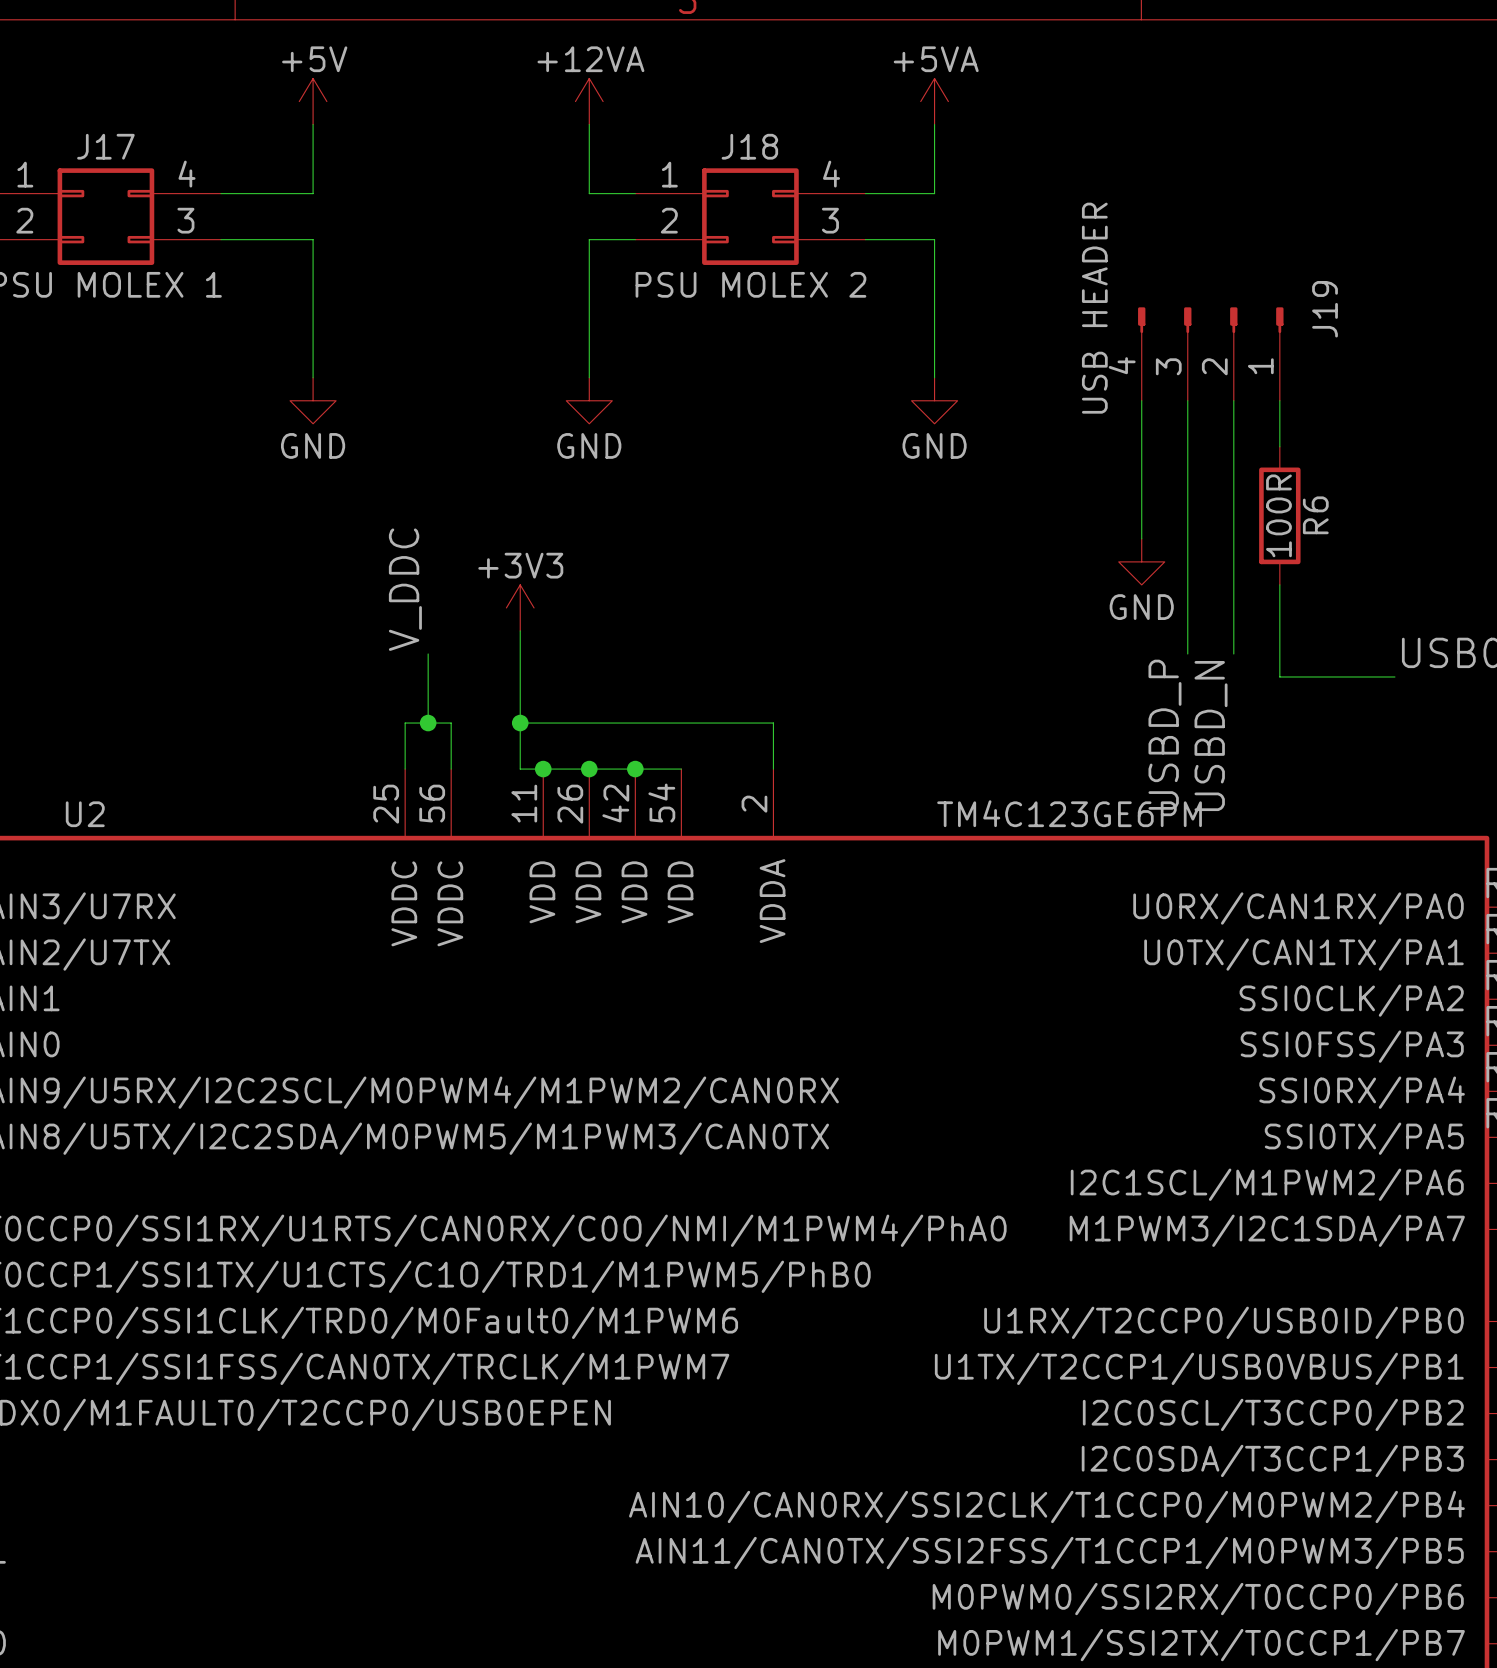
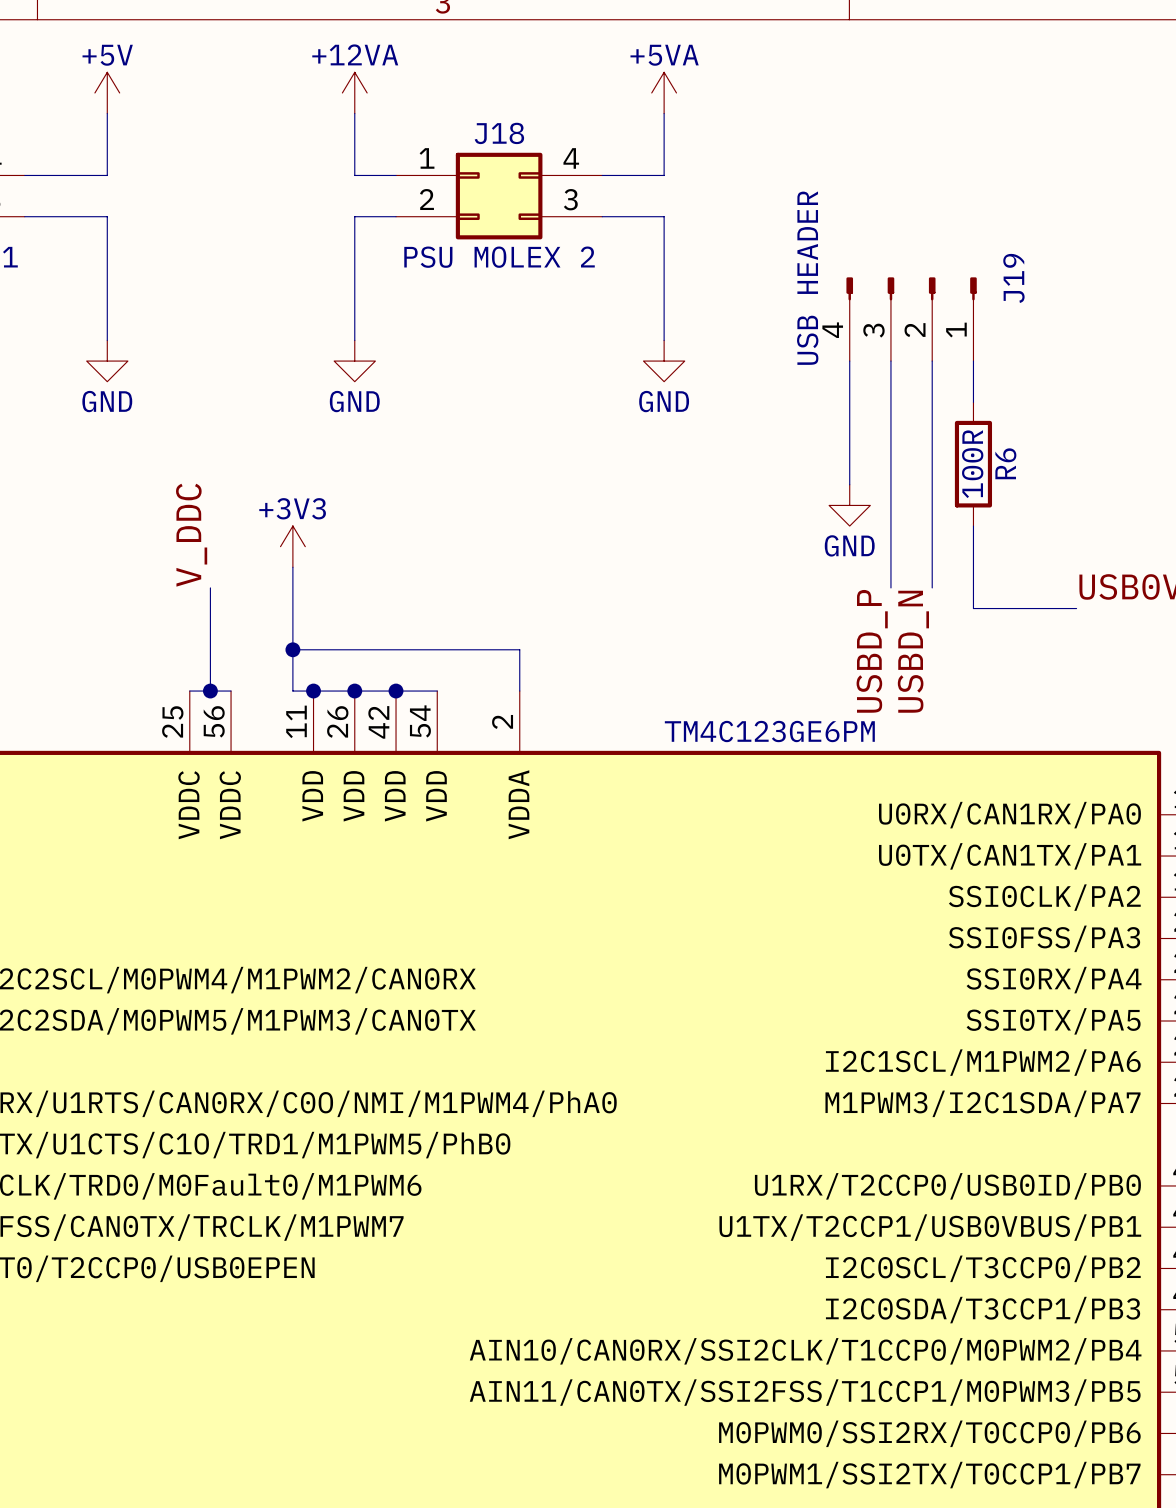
wire: none -> (210, 649) (210, 691)
junction position: (428, 723) -> (210, 691)
wire: (405, 769) (405, 723) (451, 723) (451, 769) -> (189, 691) (231, 691)

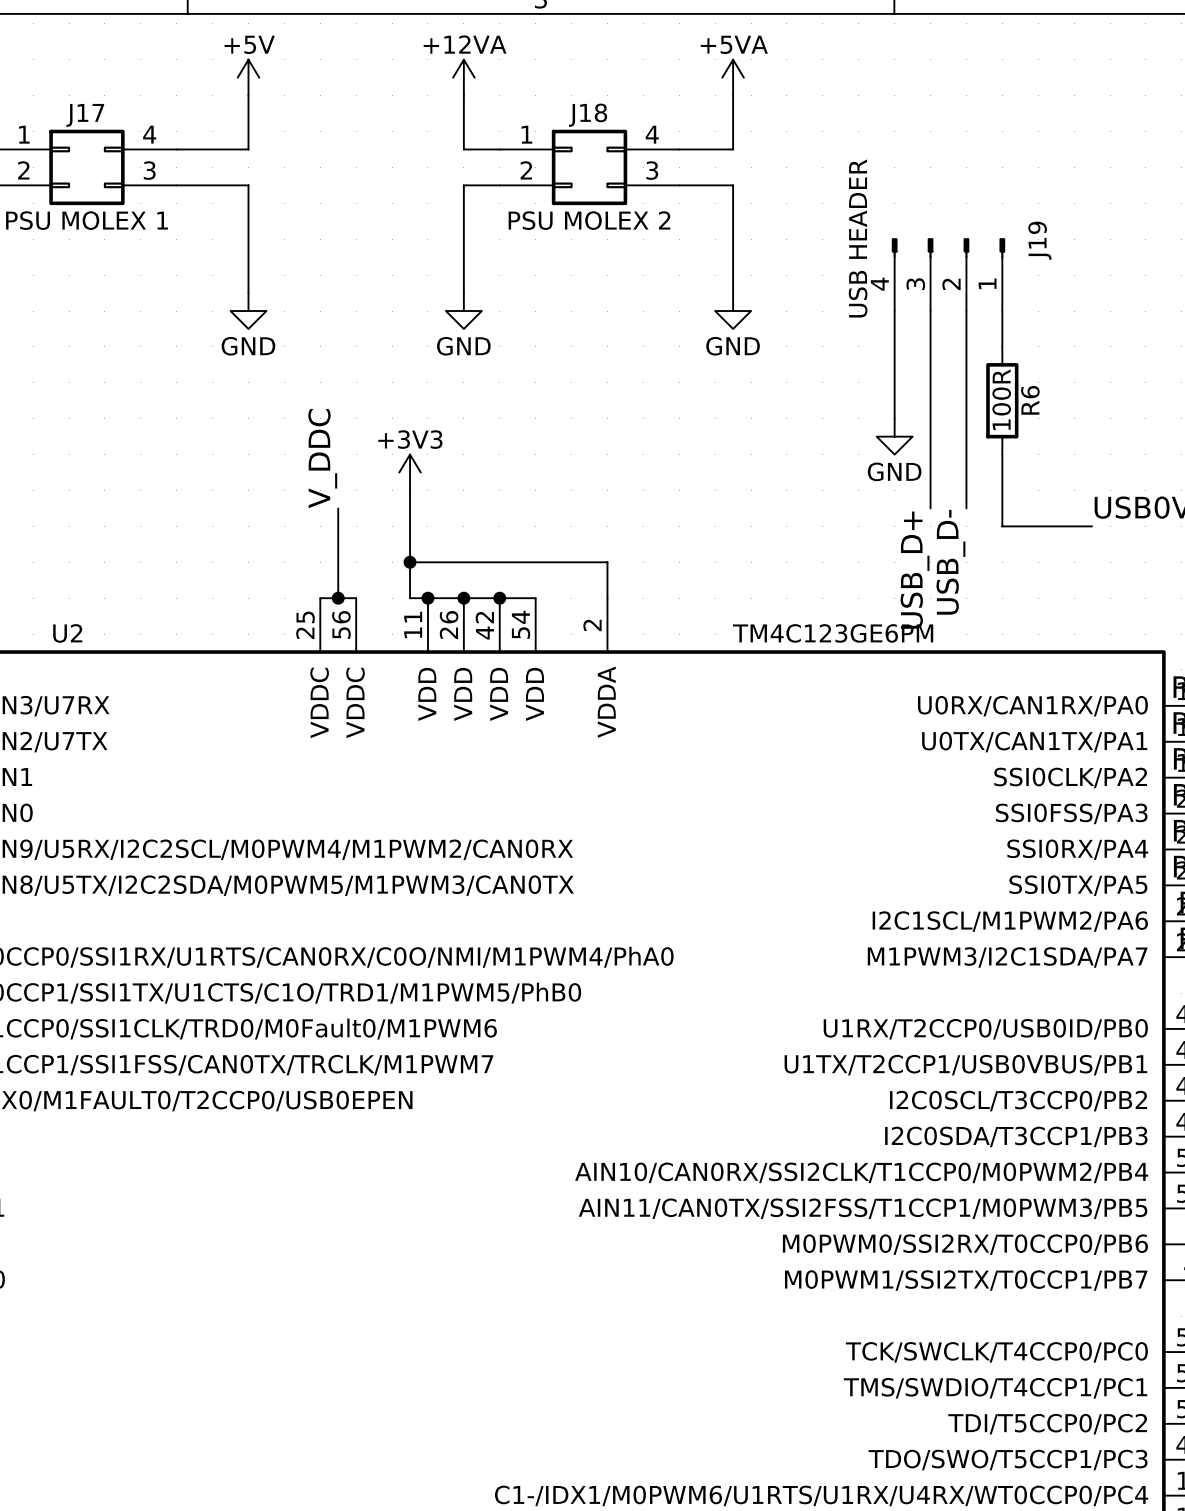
label: USBD_P (872, 651) -> USB_D+ (915, 570)
label: USBD_N (913, 651) -> USB_D- (950, 562)

